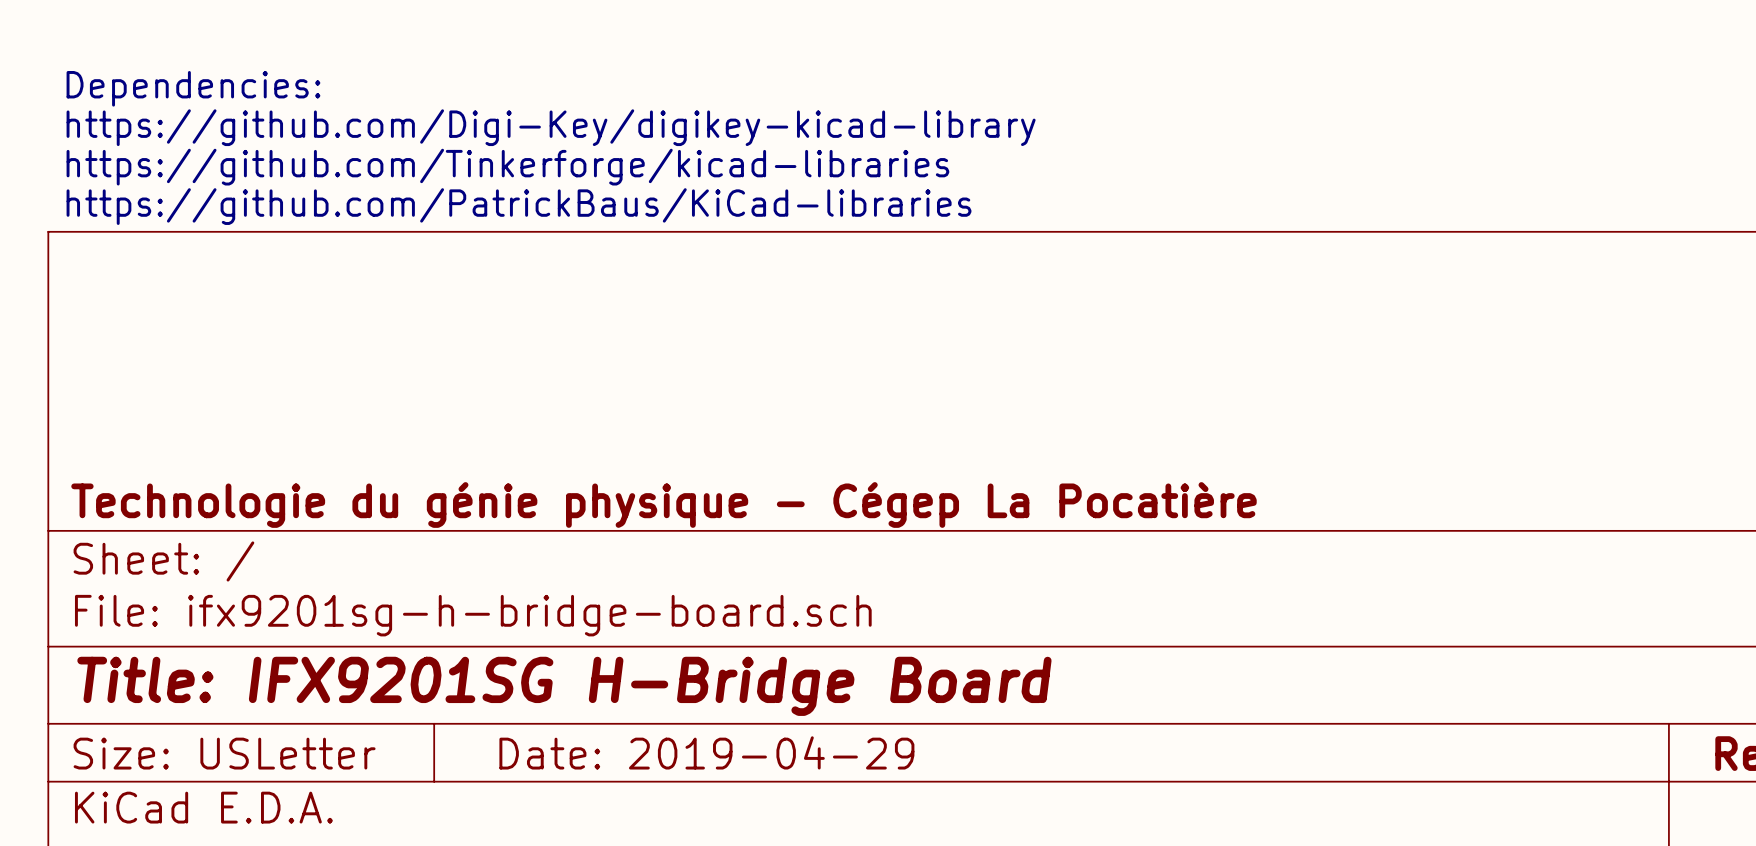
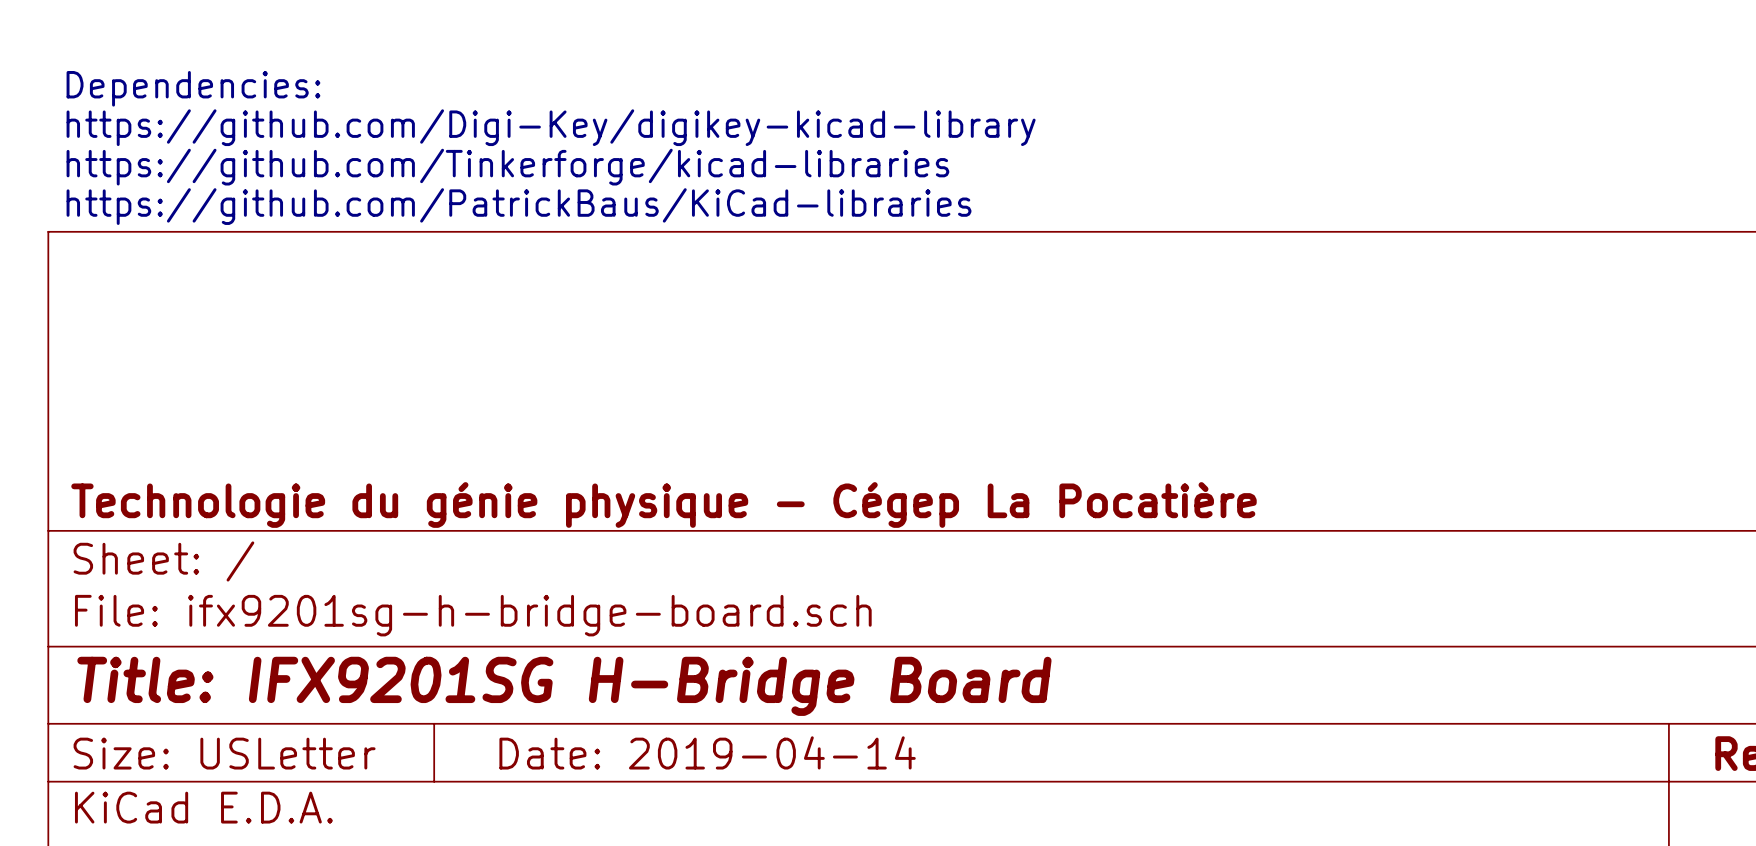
title block: Date: 2019-04-29 (706, 752) -> Date: 2019-04-14 (707, 752)

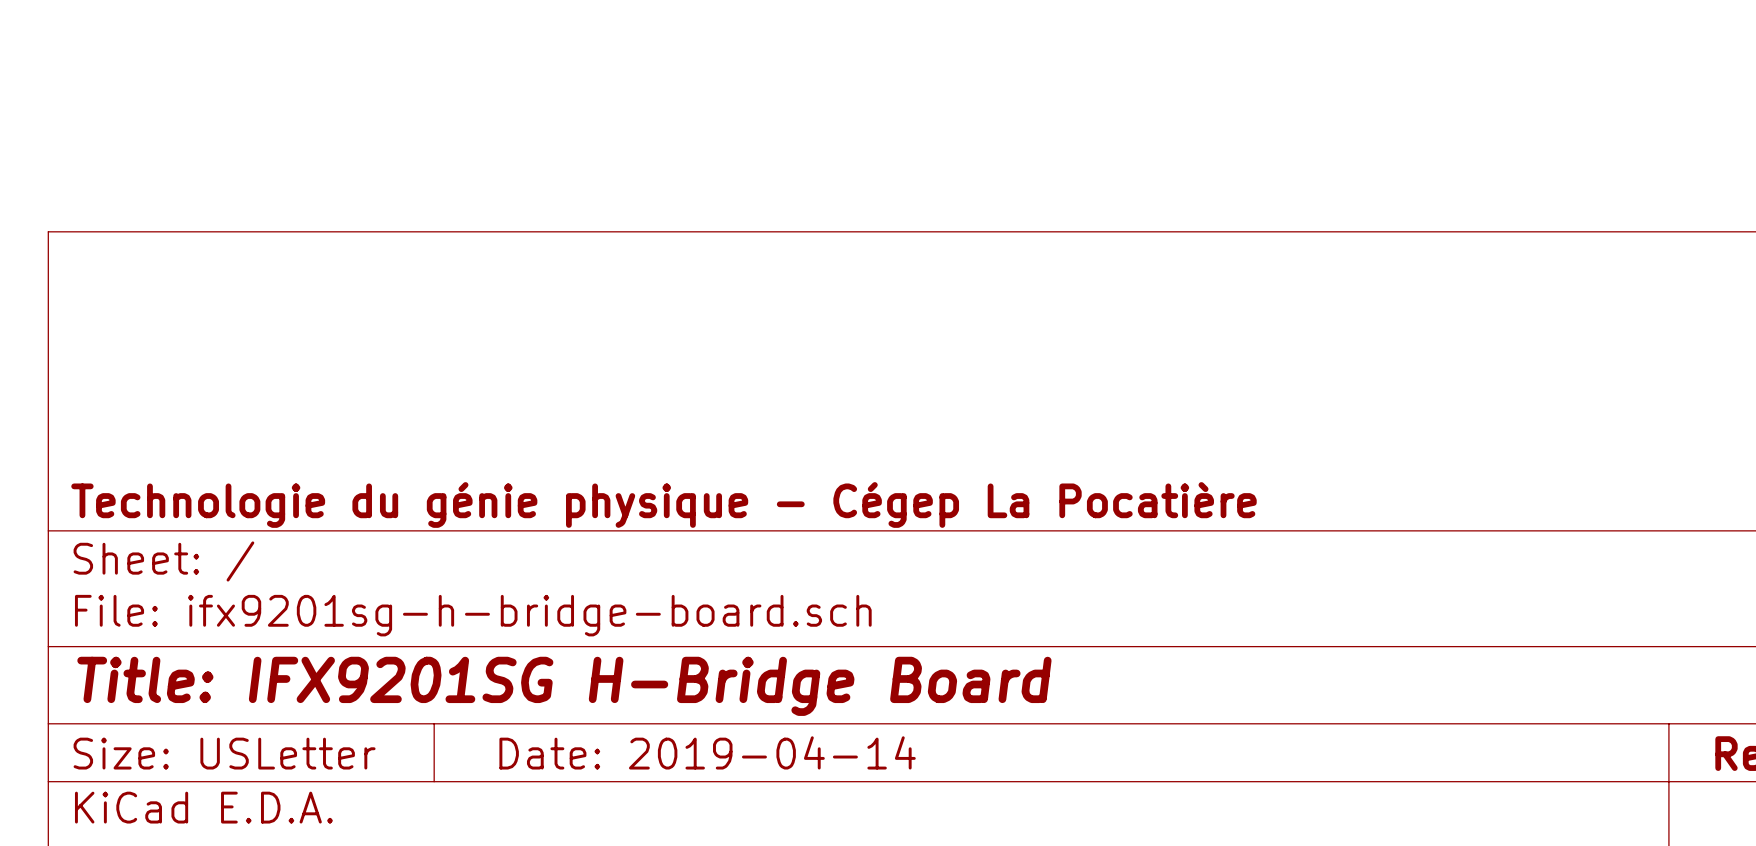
text: Dependencies: (193, 88) -> none
text: https://github.com/Digi-Key/digikey-kicad-library (551, 127) -> none
text: https://github.com/Tinkerforge/kicad-libraries (507, 167) -> none
text: https://github.com/PatrickBaus/KiCad-libraries (519, 206) -> none

